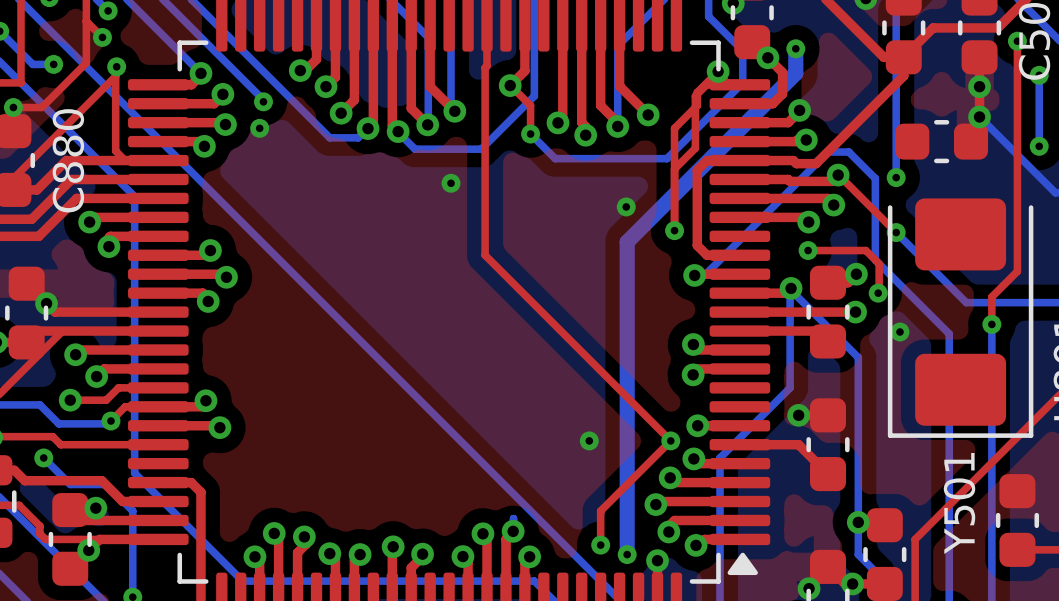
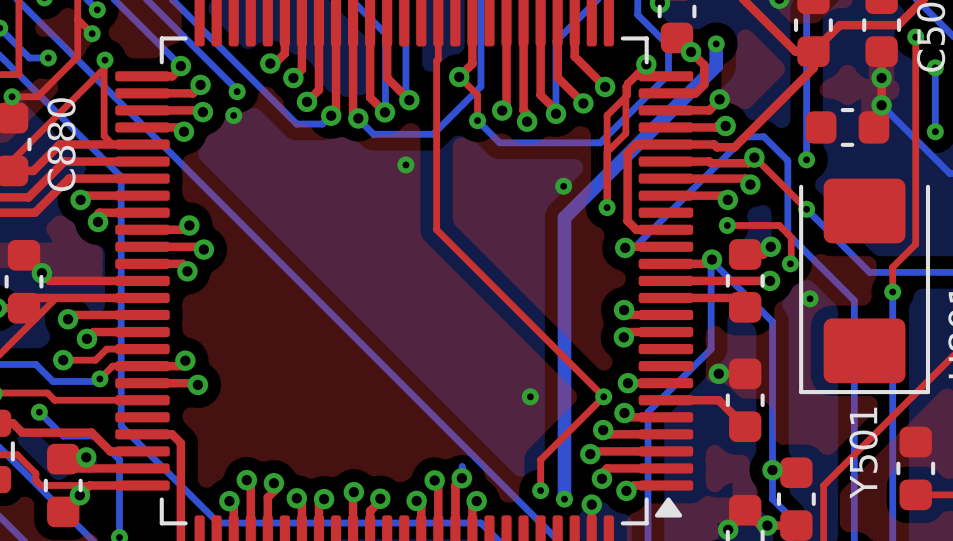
top track: none -> (574, 19) (574, 56) (605, 86)
via: none -> (605, 86)

